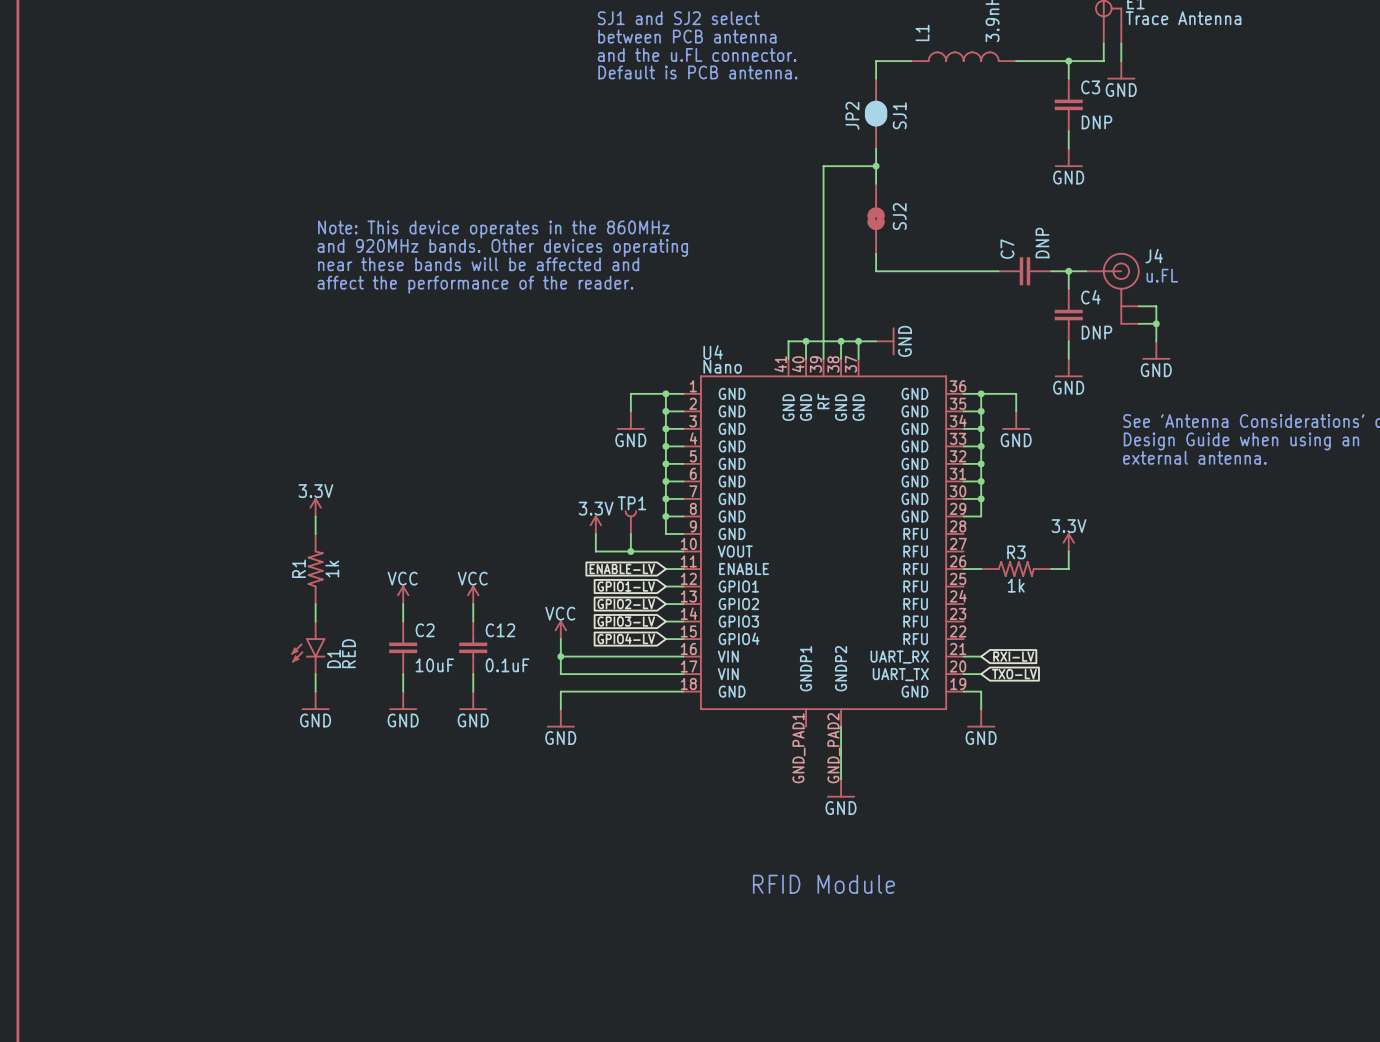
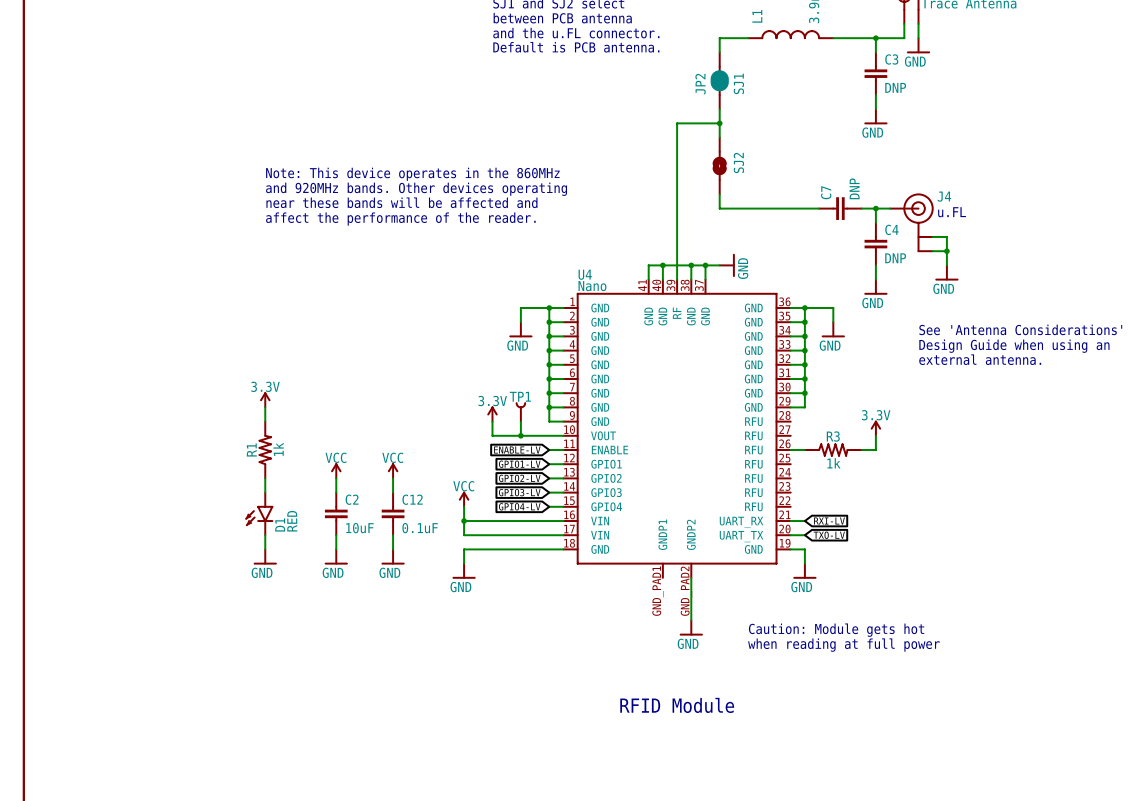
text: none -> Caution: Module gets hot (836, 630)
text: none -> when reading at full power (843, 645)

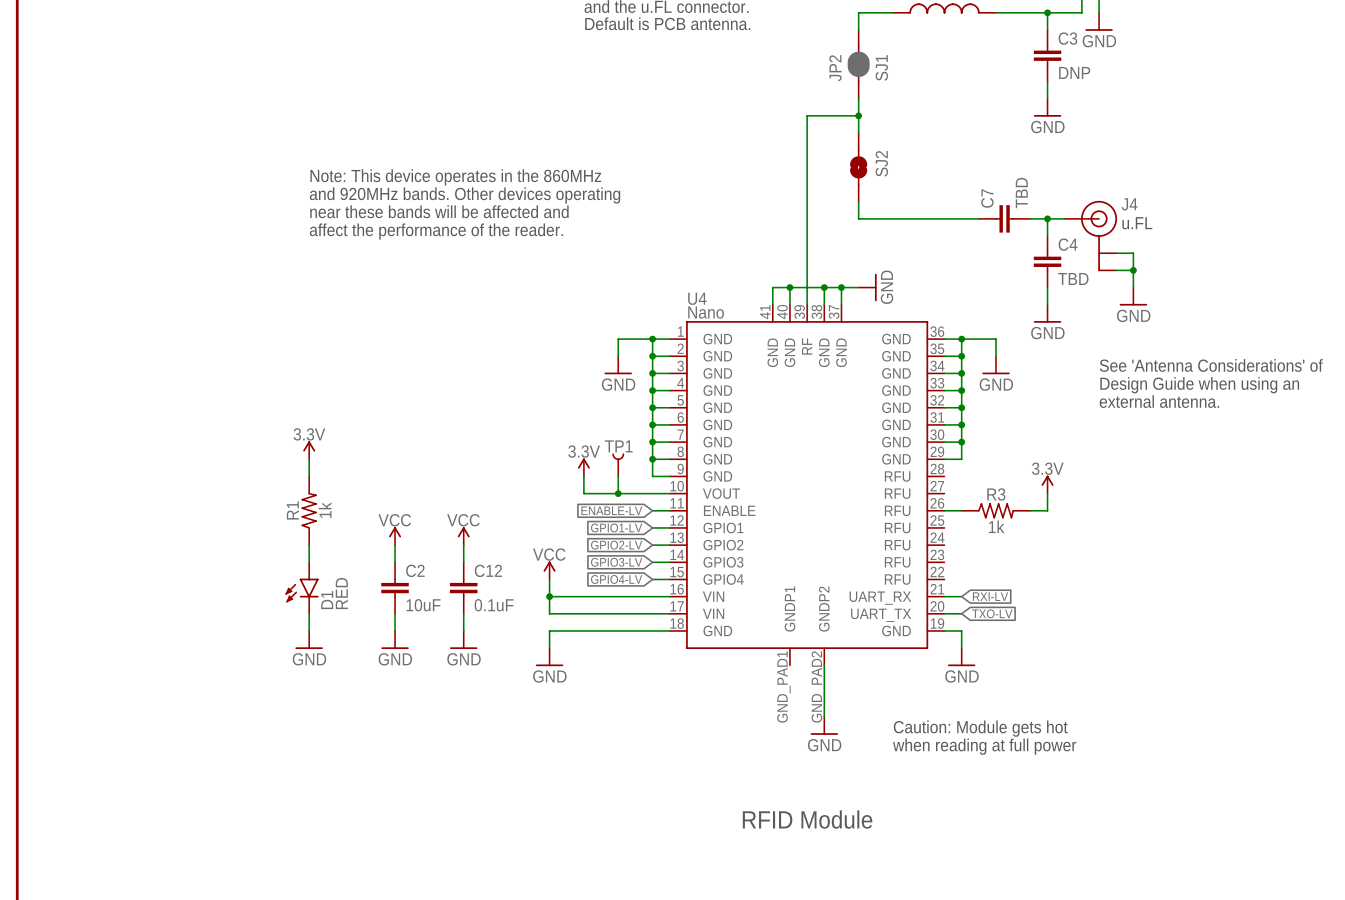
C7 value: DNP (854, 188) -> TBD (1021, 193)
C4 value: DNP (895, 258) -> TBD (1073, 278)

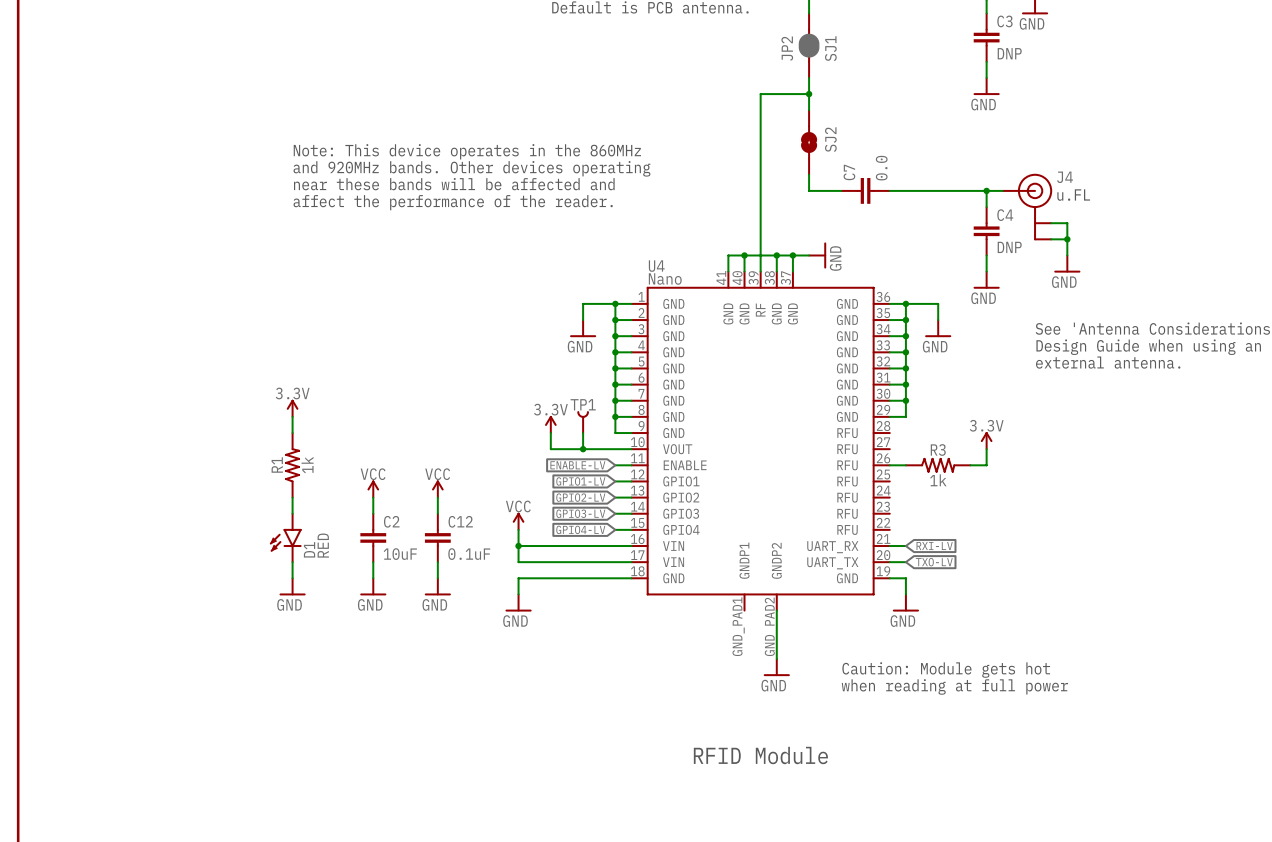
C7 value: TBD (1021, 193) -> 0.0 (881, 168)
C7 position: (1004, 218) -> (865, 190)
C4 value: TBD (1073, 278) -> DNP (1009, 247)

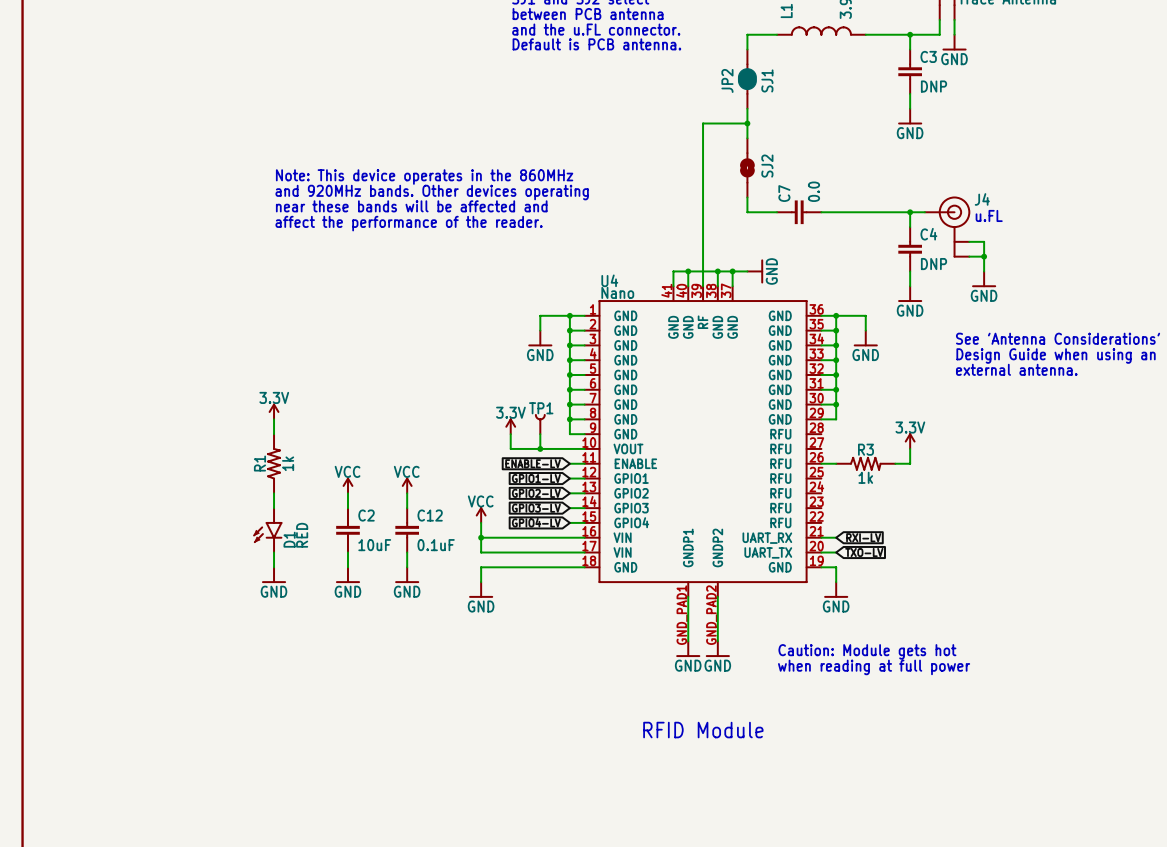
wire: none -> (688, 596) (688, 641)
power symbol: none -> GND (688, 649)

